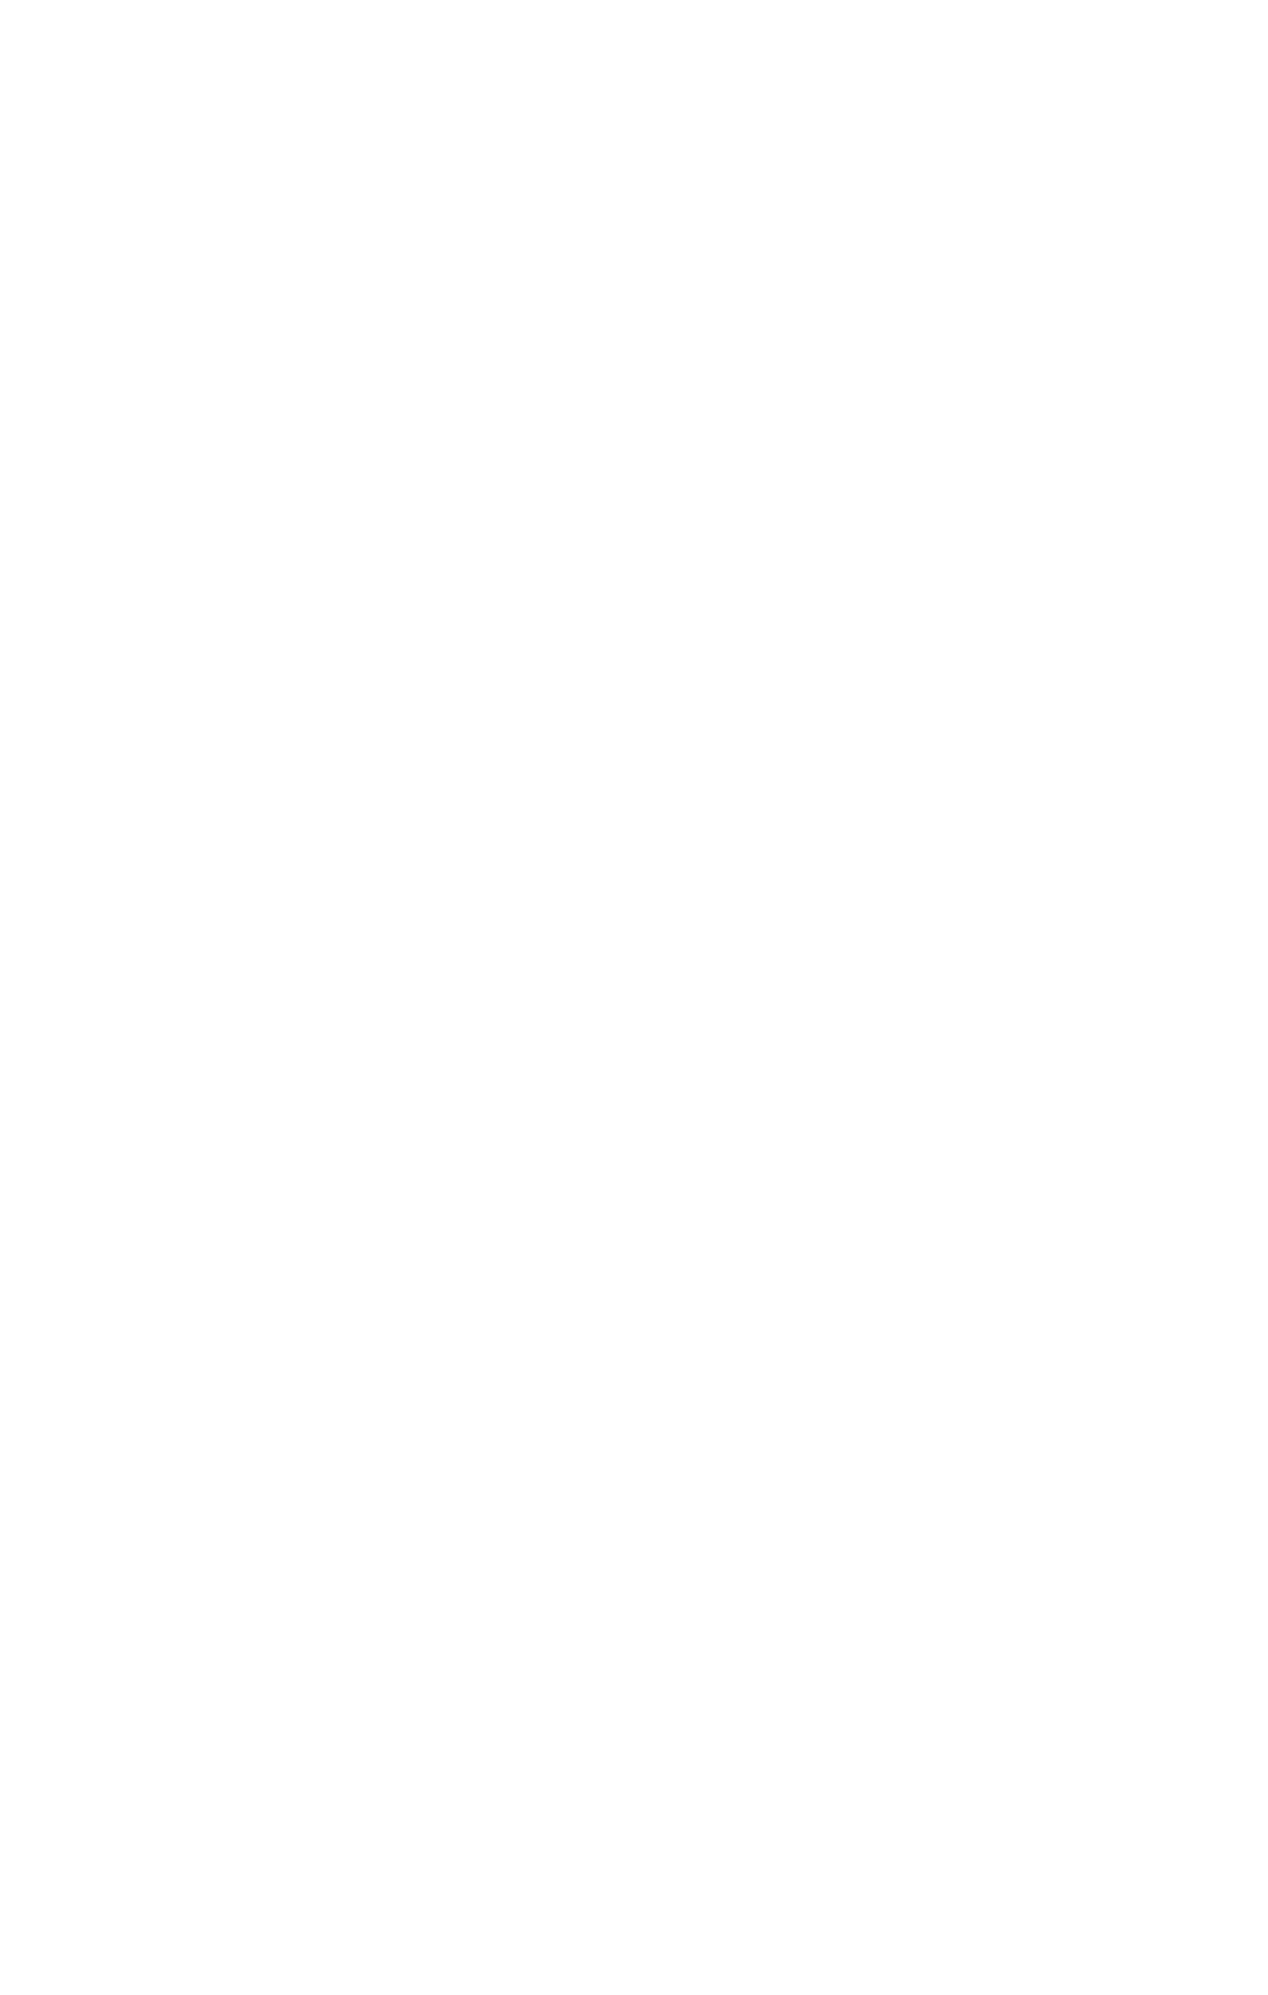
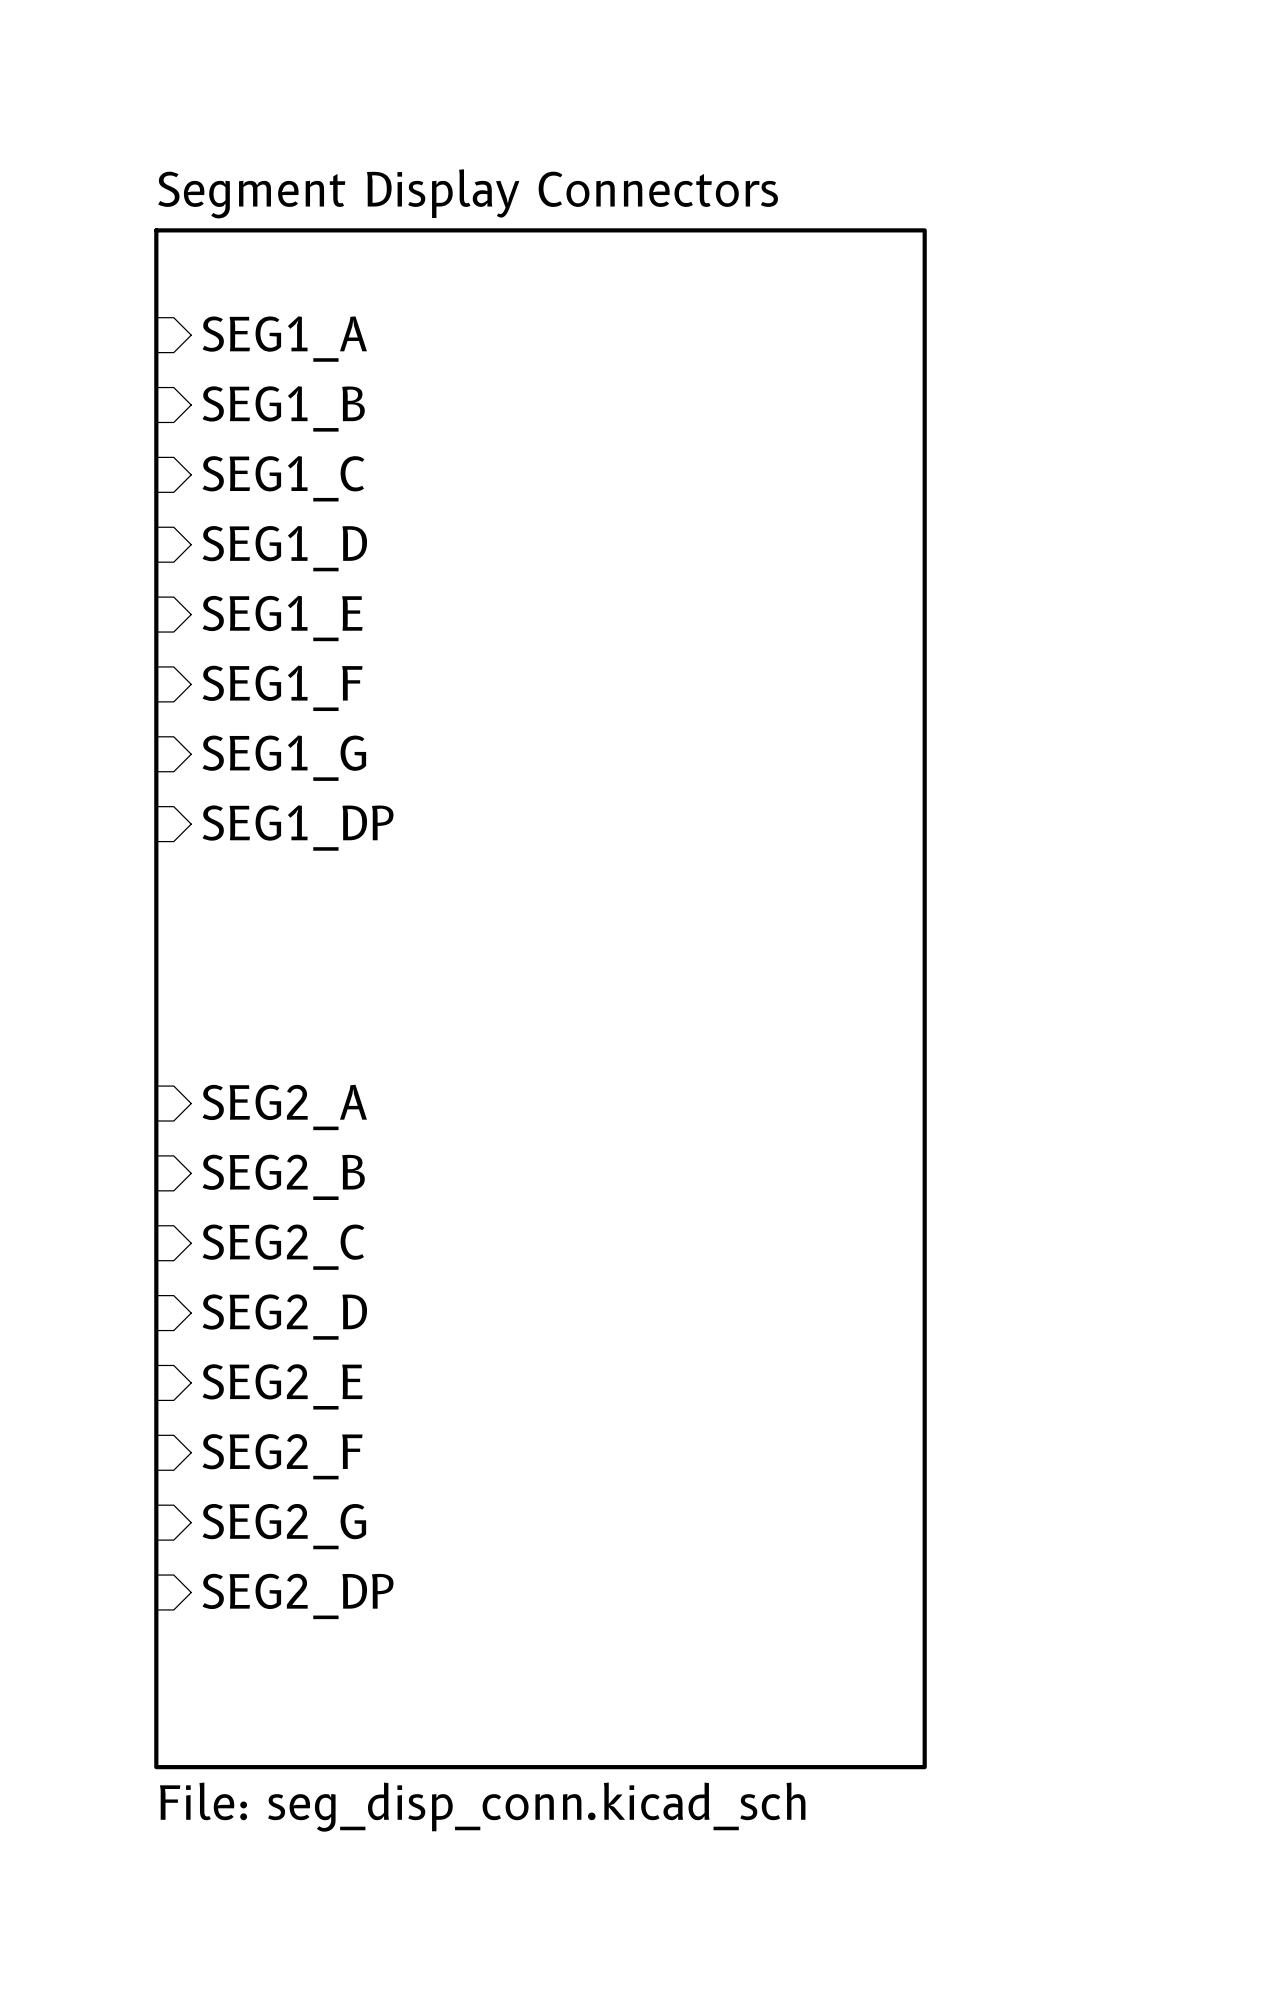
sheet pin: none -> SEG1_A (284, 339)
sheet pin: none -> SEG1_B (283, 408)
sheet pin: none -> SEG1_C (283, 478)
sheet pin: none -> SEG1_D (284, 548)
sheet pin: none -> SEG1_E (282, 618)
sheet pin: none -> SEG1_F (282, 688)
sheet pin: none -> SEG1_G (284, 758)
sheet pin: none -> SEG1_DP (298, 828)
sheet Segment Display Connectors: none -> File: seg_disp_conn.kicad_sch (540, 998)
sheet pin: none -> SEG2_A (284, 1107)
sheet pin: none -> SEG2_B (283, 1177)
sheet pin: none -> SEG2_C (283, 1247)
sheet pin: none -> SEG2_D (284, 1317)
sheet pin: none -> SEG2_E (282, 1386)
sheet pin: none -> SEG2_F (282, 1456)
sheet pin: none -> SEG2_G (284, 1526)
sheet pin: none -> SEG2_DP (298, 1596)

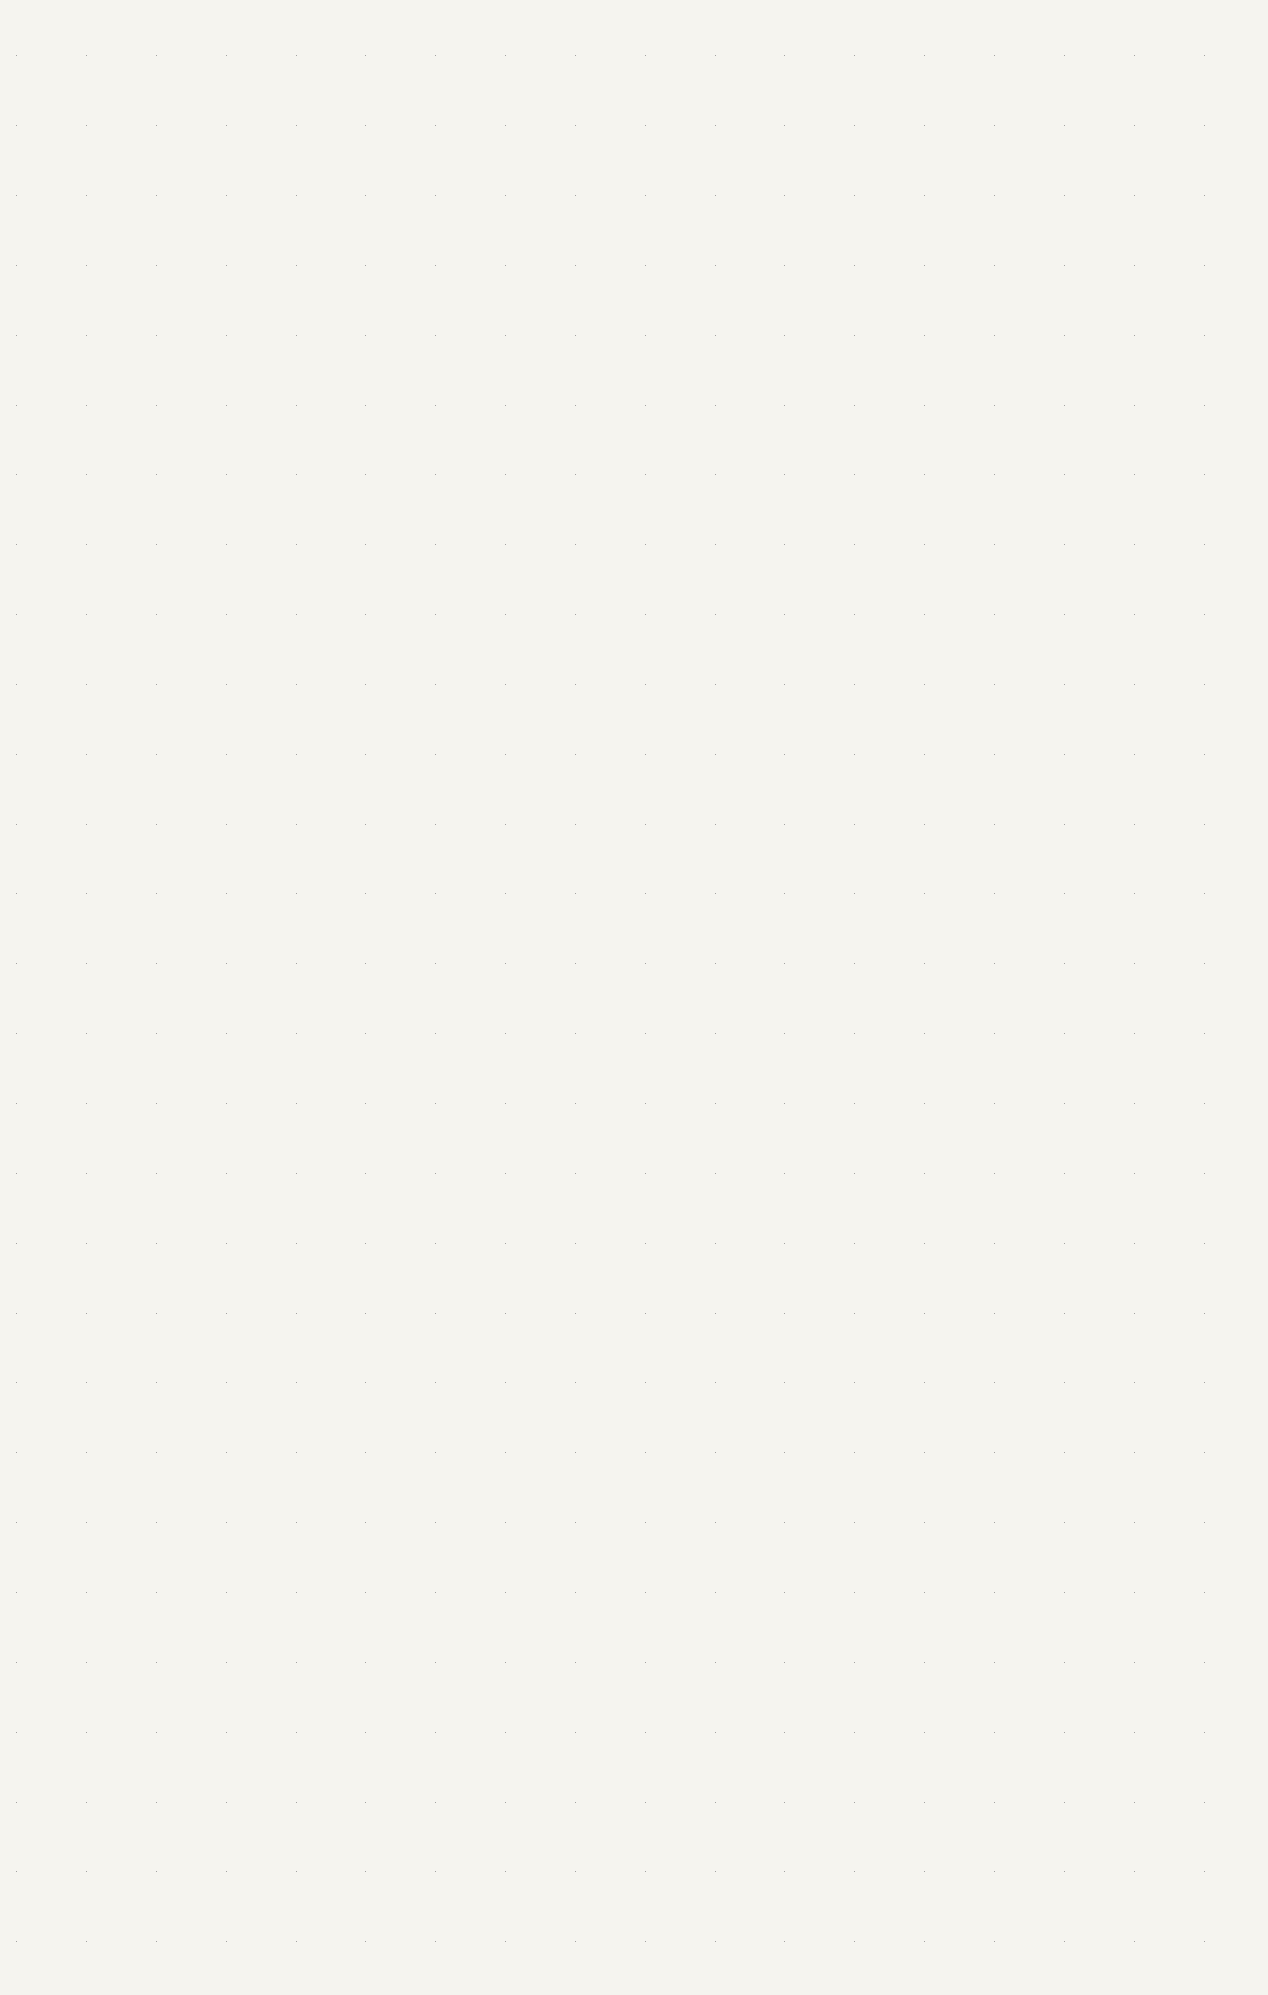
sheet pin: SEG1_A (284, 339) -> none
sheet pin: SEG1_B (283, 408) -> none
sheet pin: SEG1_C (283, 478) -> none
sheet pin: SEG1_D (284, 548) -> none
sheet pin: SEG1_E (282, 618) -> none
sheet pin: SEG1_F (282, 688) -> none
sheet pin: SEG1_G (284, 758) -> none
sheet pin: SEG1_DP (298, 828) -> none
sheet Segment Display Connectors: File: seg_disp_conn.kicad_sch (540, 998) -> none
sheet pin: SEG2_A (284, 1107) -> none
sheet pin: SEG2_B (283, 1177) -> none
sheet pin: SEG2_C (283, 1247) -> none
sheet pin: SEG2_D (284, 1317) -> none
sheet pin: SEG2_E (282, 1386) -> none
sheet pin: SEG2_F (282, 1456) -> none
sheet pin: SEG2_G (284, 1526) -> none
sheet pin: SEG2_DP (298, 1596) -> none

